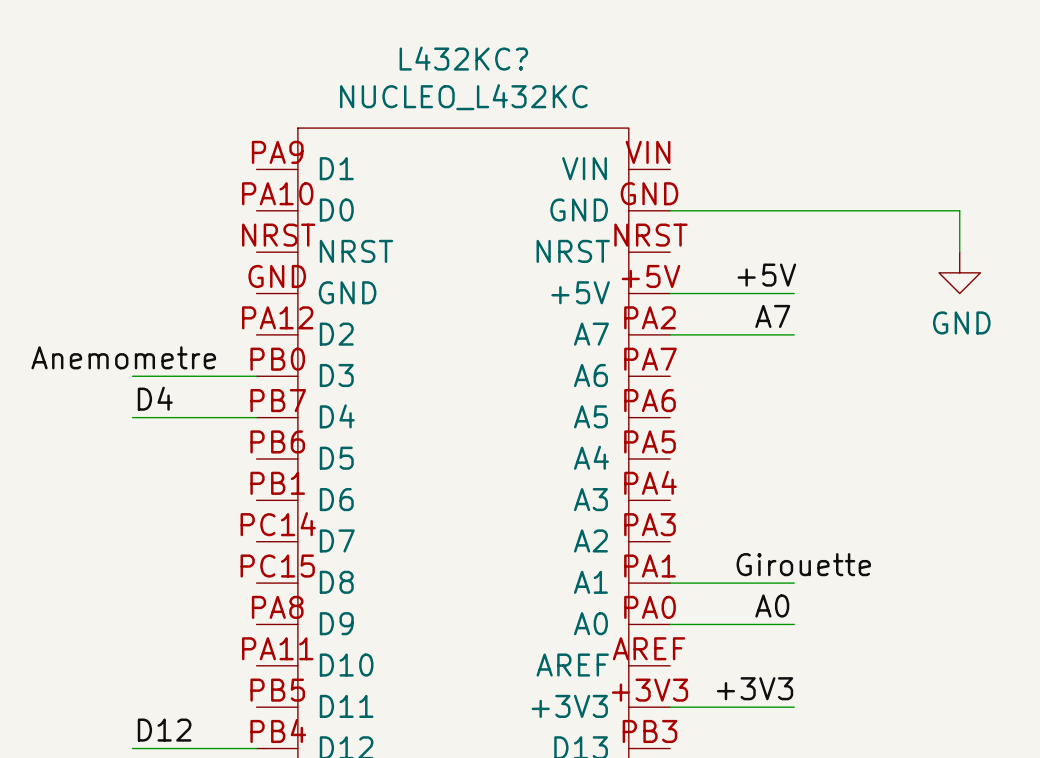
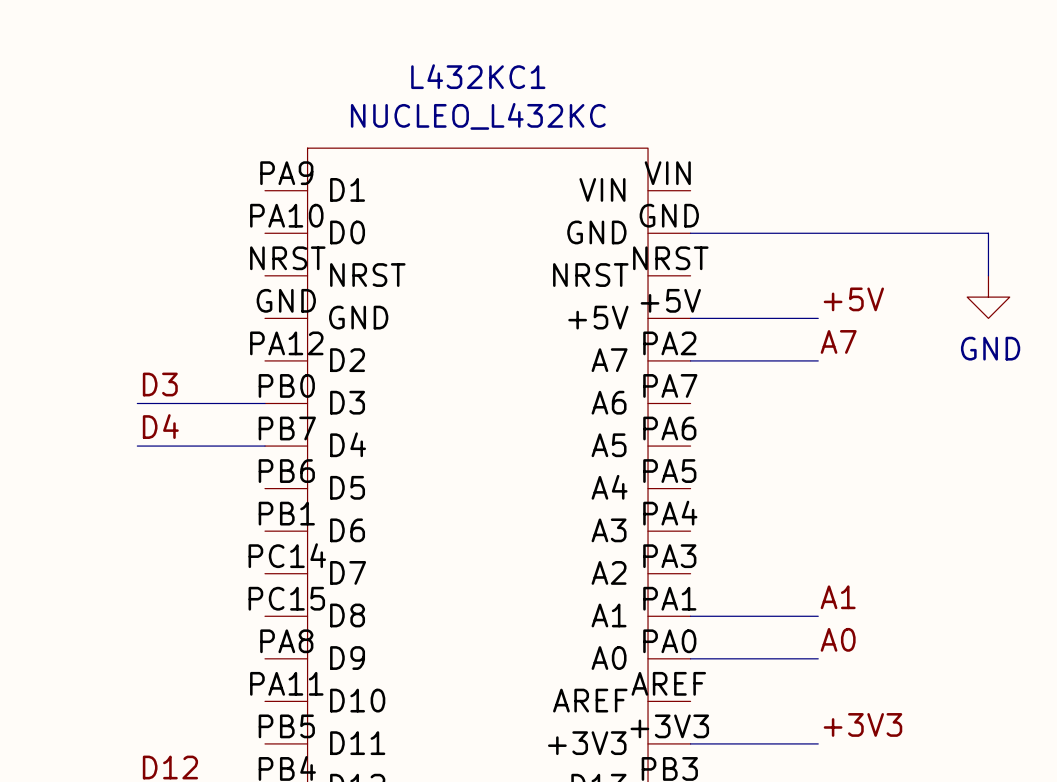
L432KC? name: L432KC? (463, 58) -> L432KC1 (478, 76)
label position: +5V (766, 275) -> +5V (853, 299)
label position: A7 (772, 316) -> A7 (838, 341)
label: Anemometre (123, 357) -> none
label: none -> D3 (160, 384)
label: Girouette (803, 564) -> none
label: none -> A1 (838, 597)
label position: A0 (772, 605) -> A0 (838, 639)
label position: +3V3 (755, 688) -> +3V3 (862, 724)

